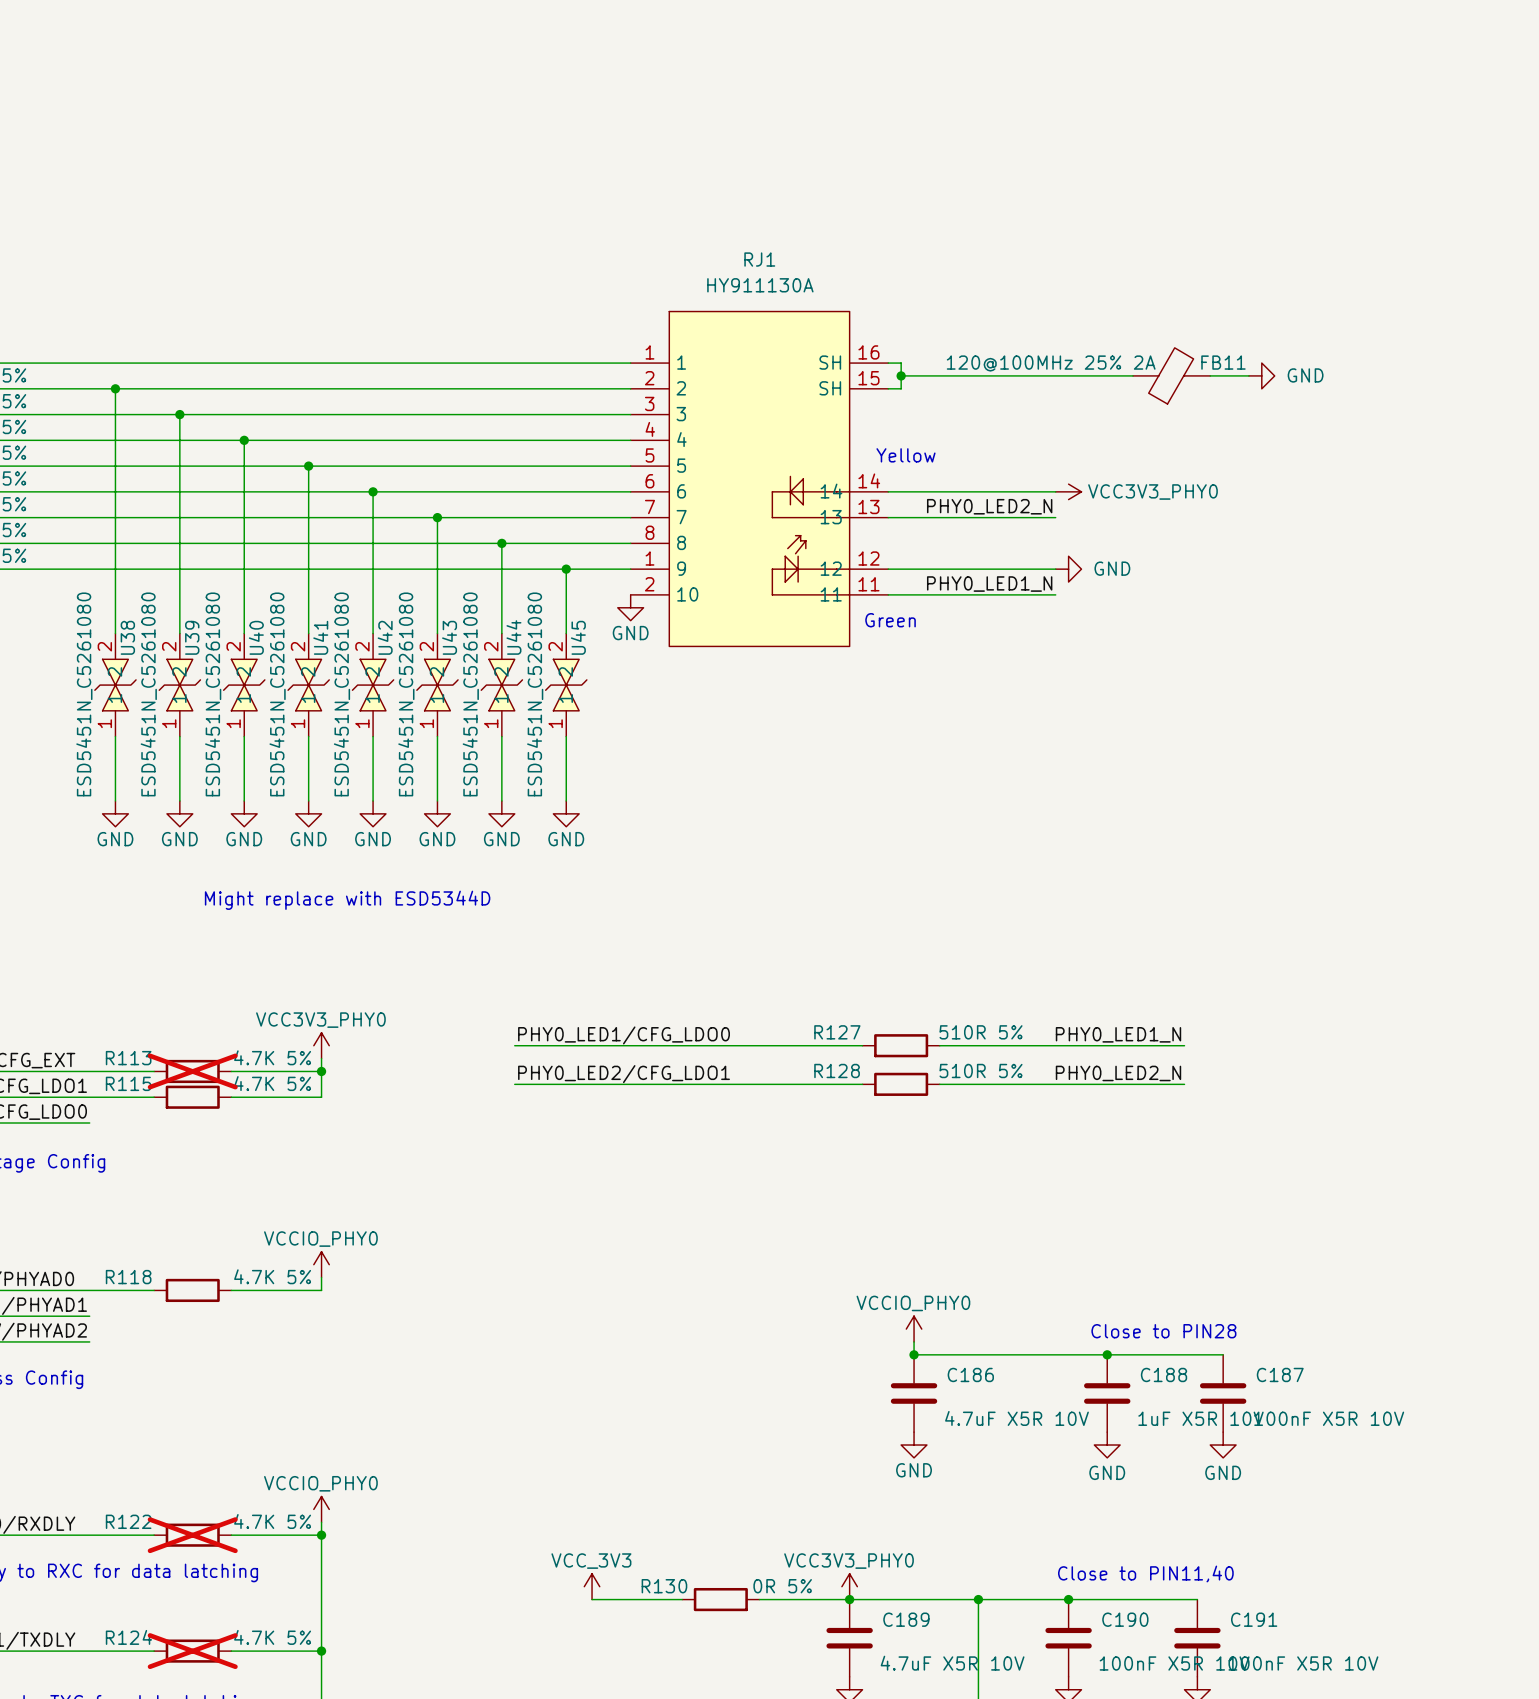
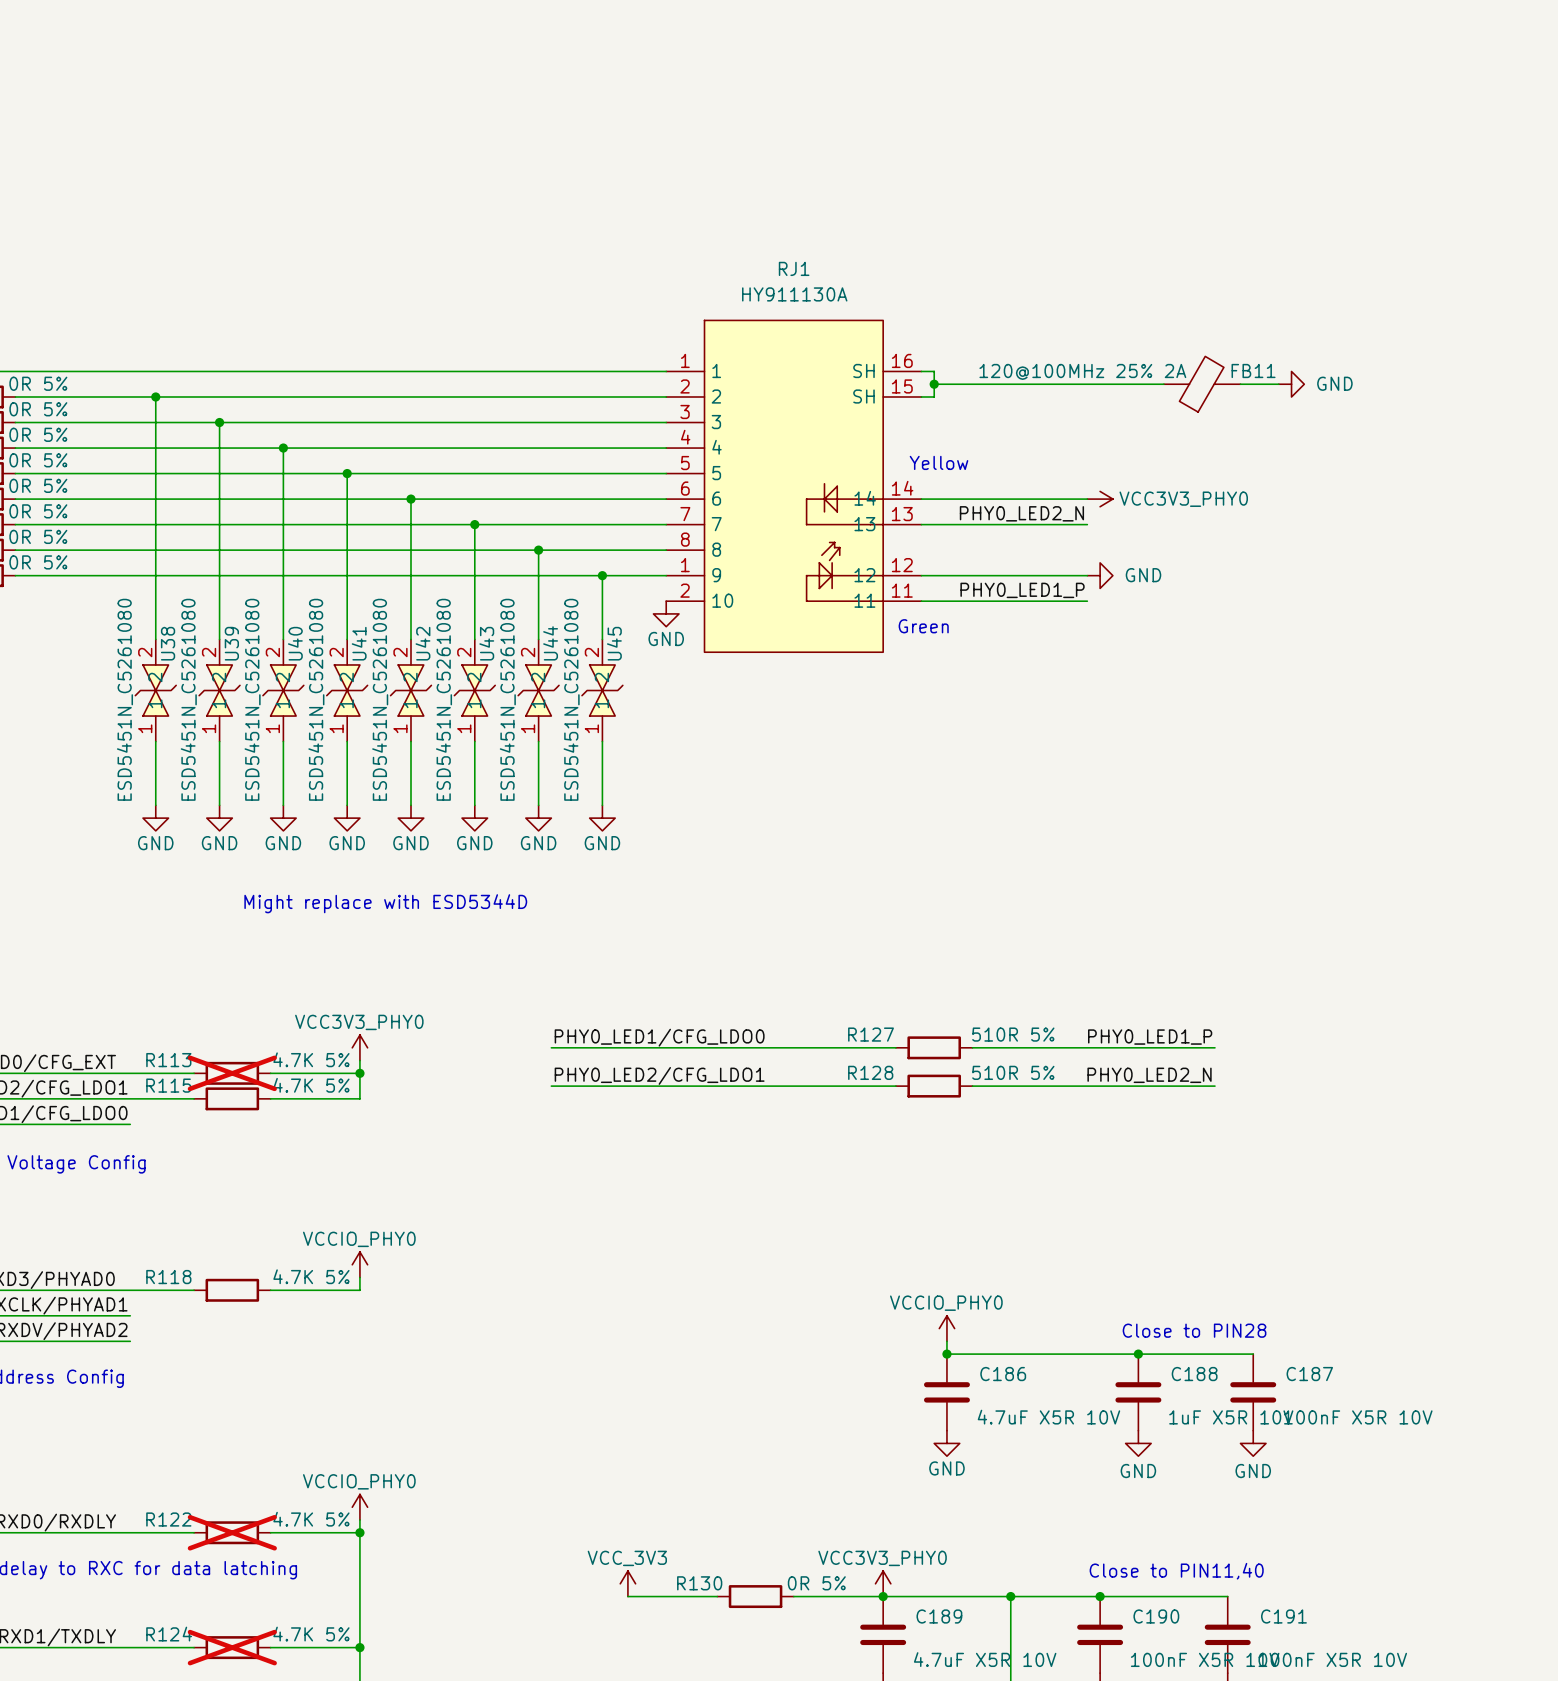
label: PHY0_LED1_N (989, 584) -> PHY0_LED1_P (1022, 590)
label: PHY0_LED1_N (1118, 1034) -> PHY0_LED1_P (1150, 1037)

